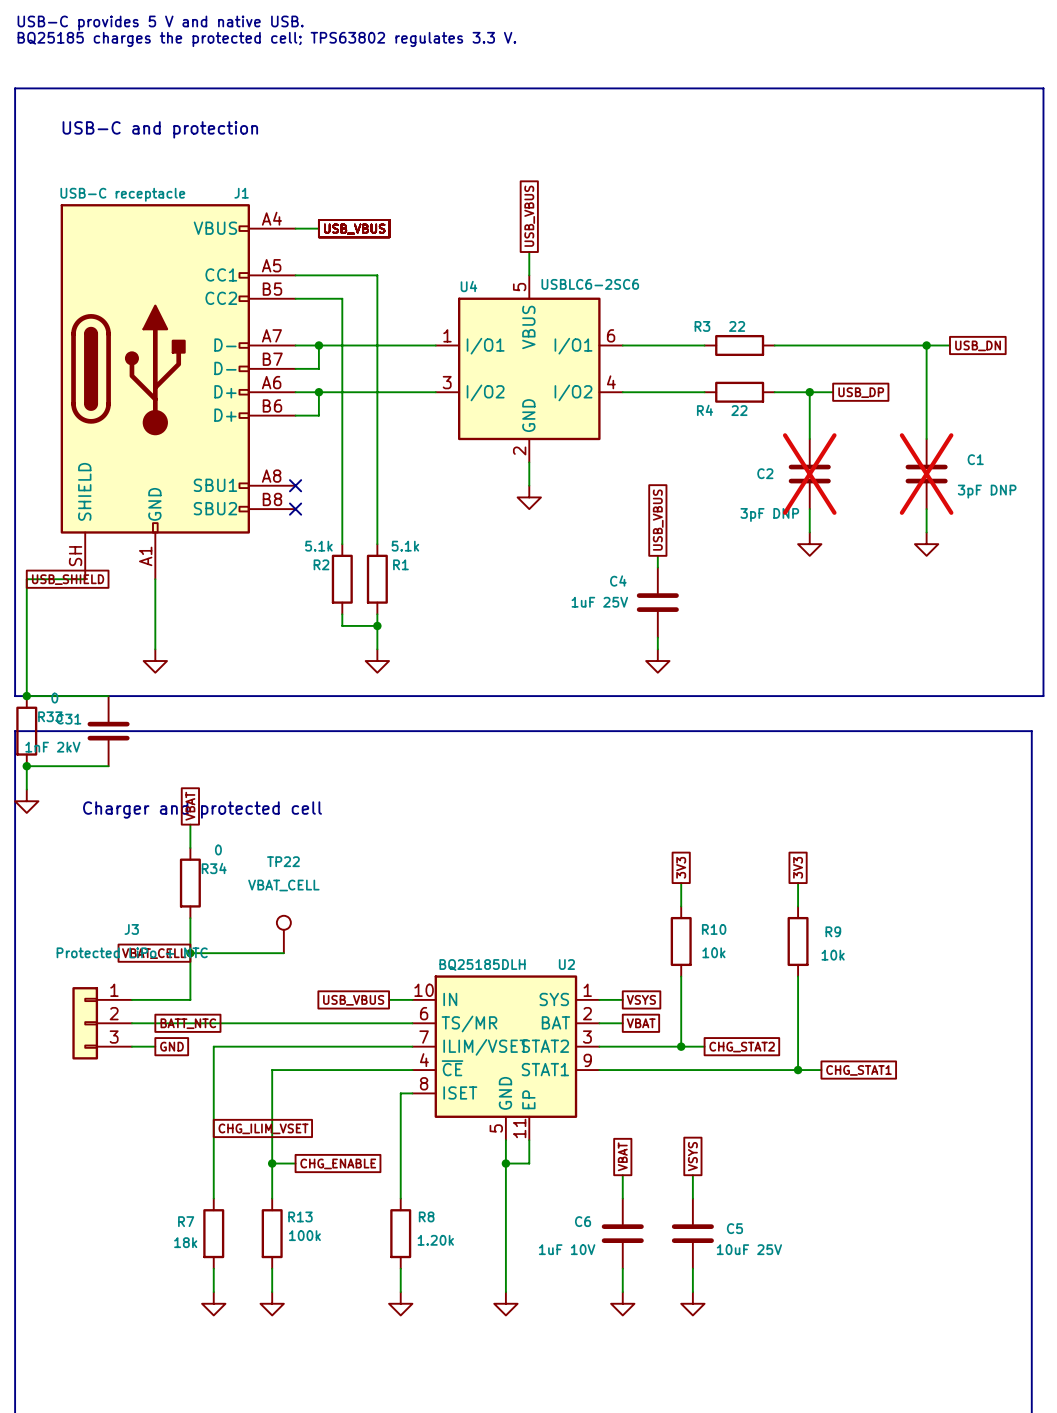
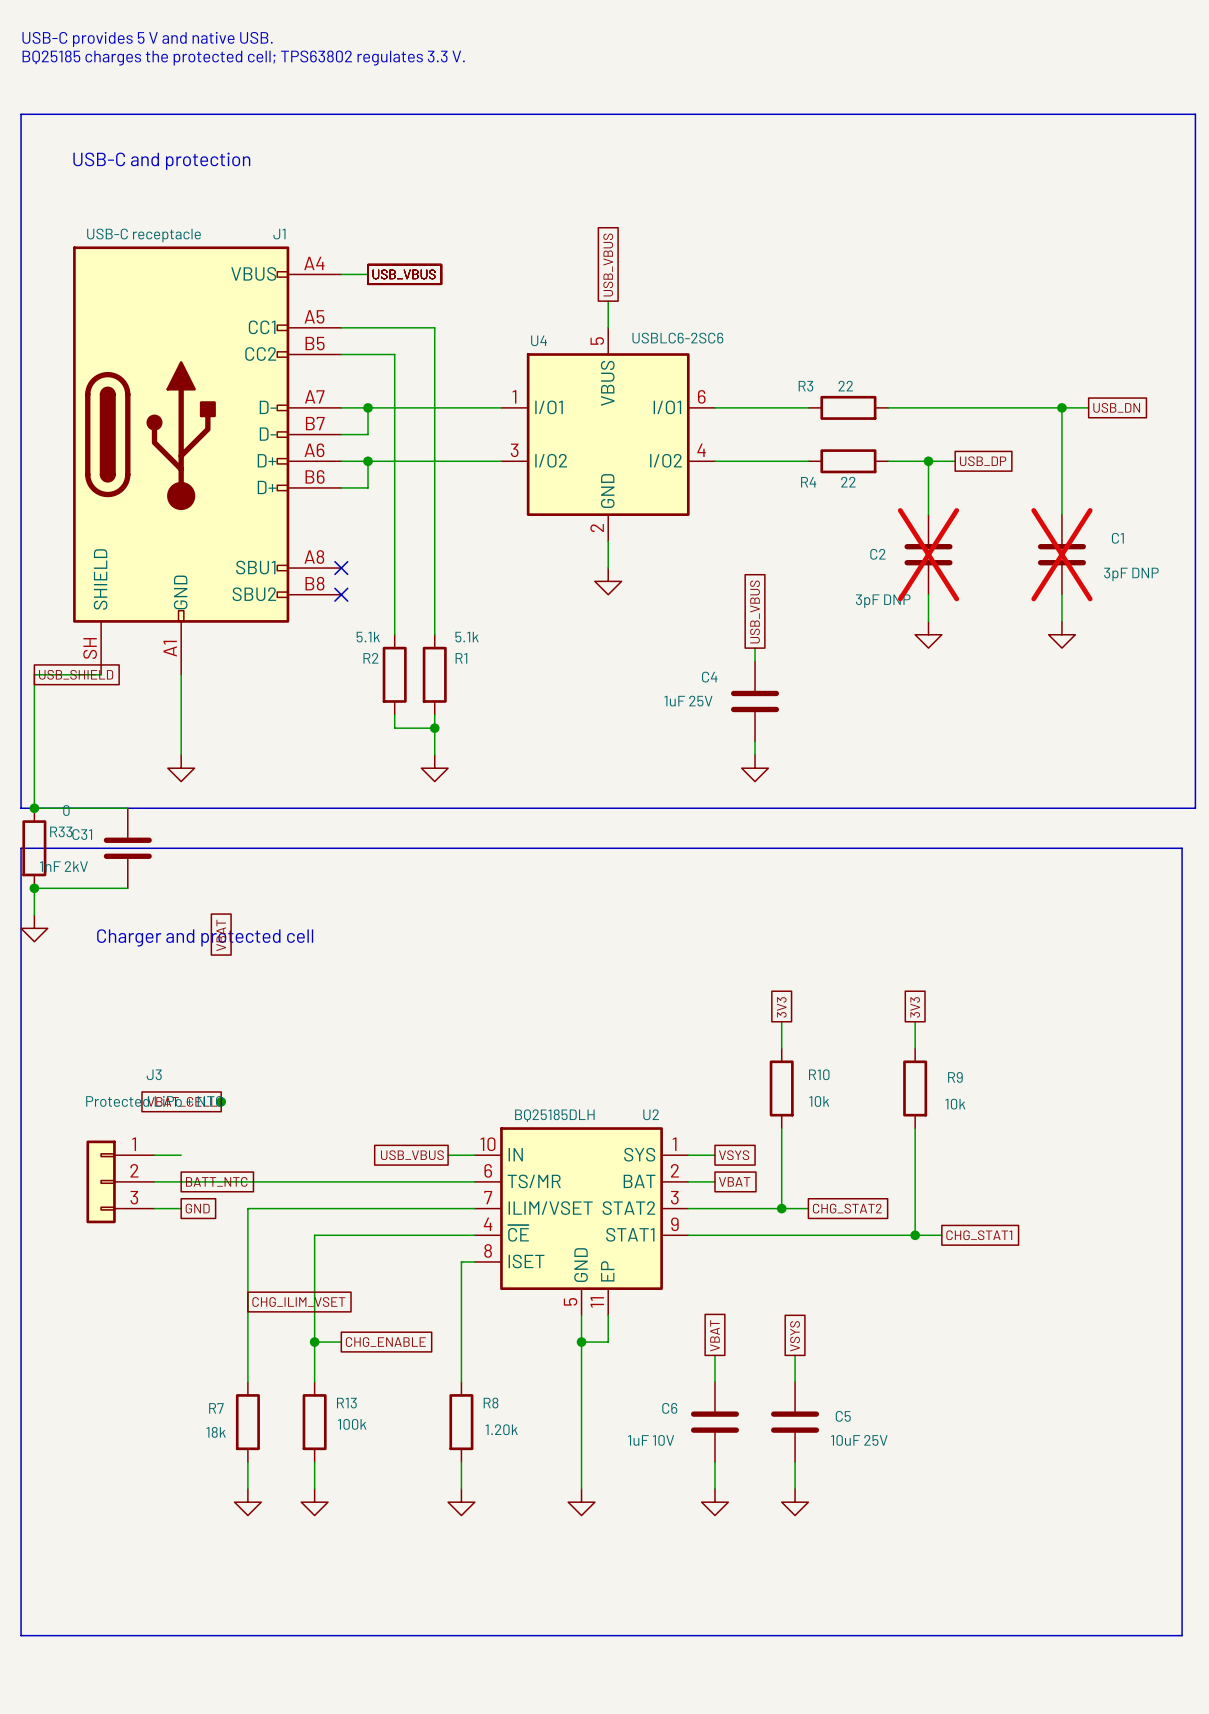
wire: (190, 824) (190, 848) -> none
R34: 0 (190, 883) -> none
wire: (190, 918) (190, 999) (155, 999) -> none
TP22: VBAT_CELL (283, 934) -> none
wire: (190, 953) (283, 953) -> none

